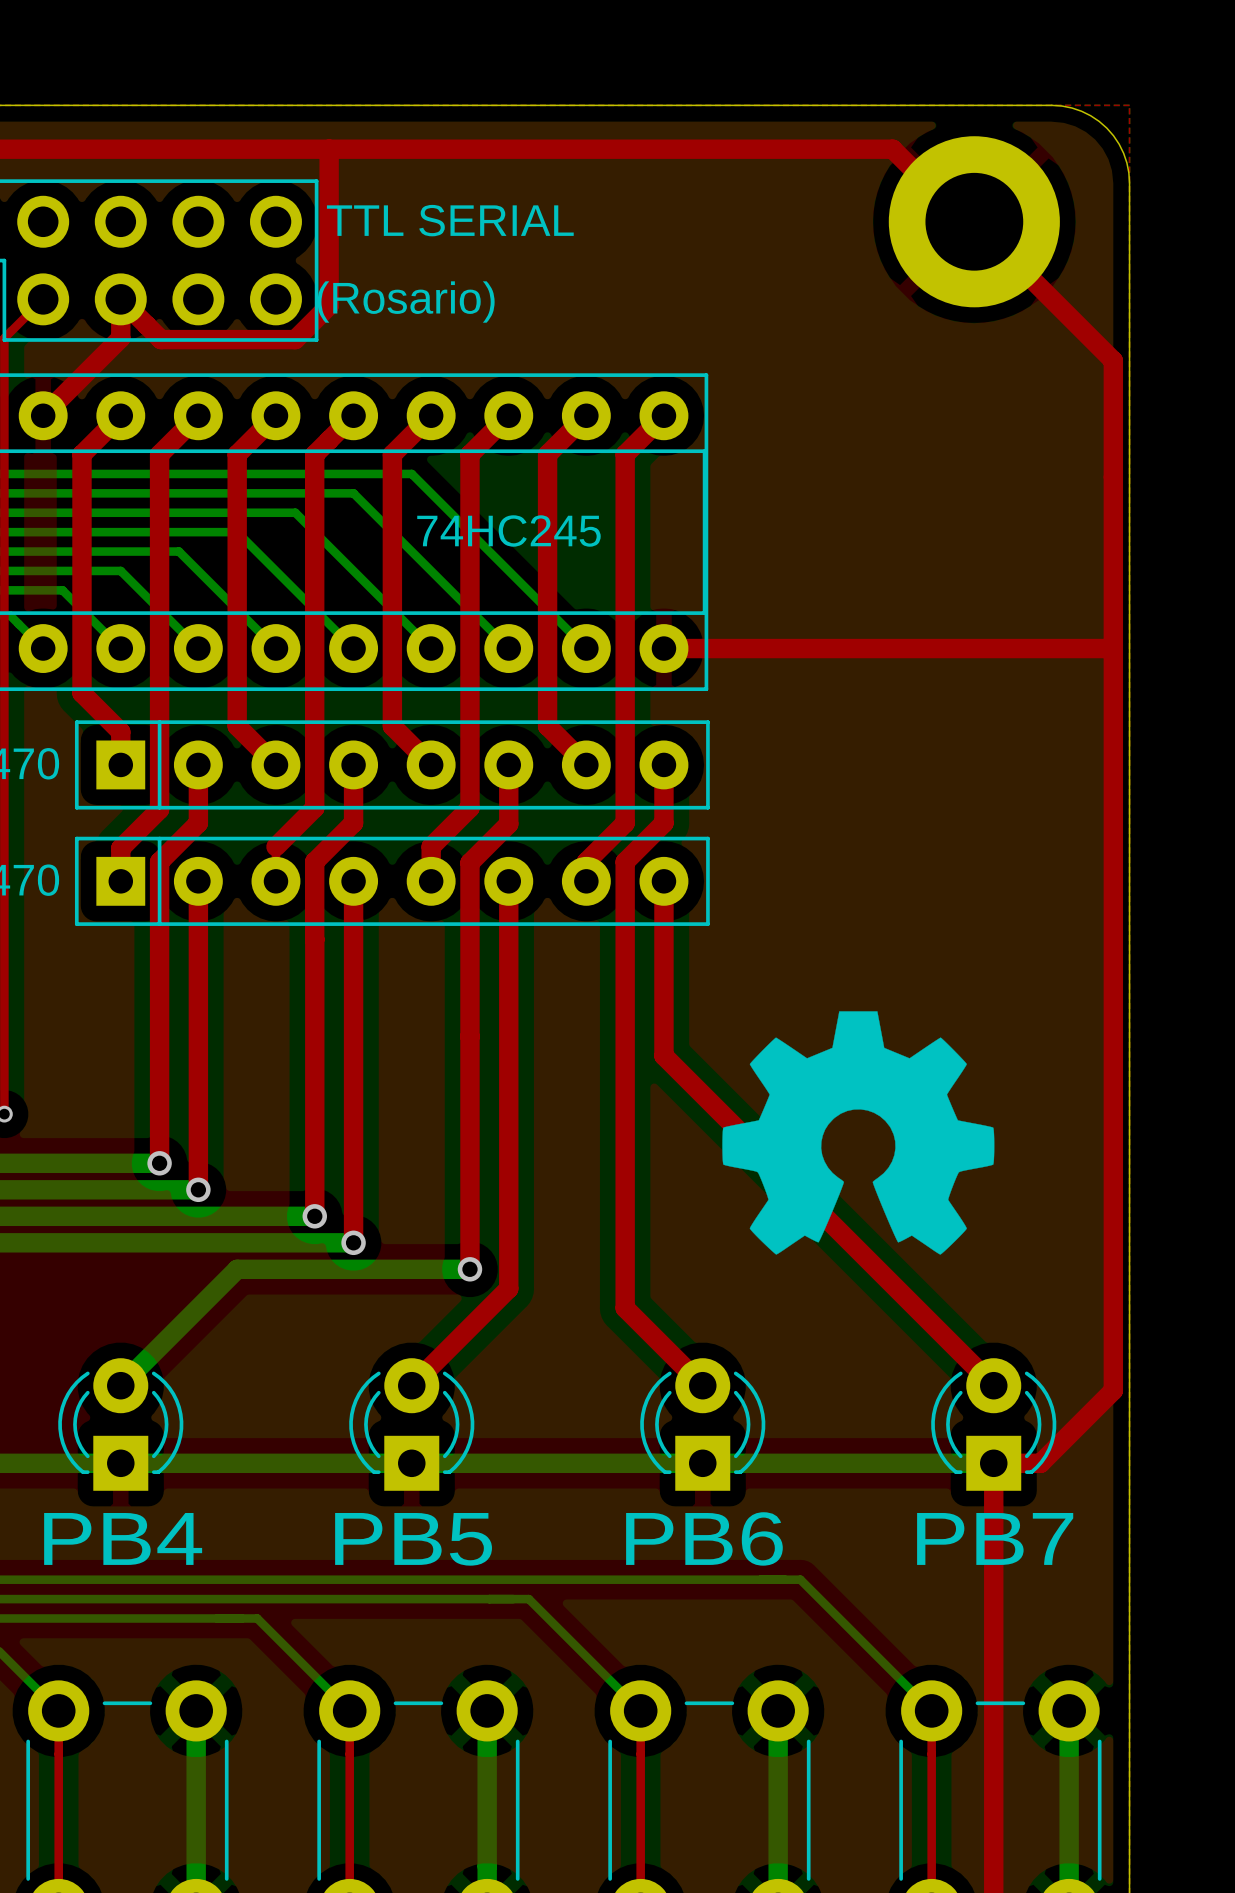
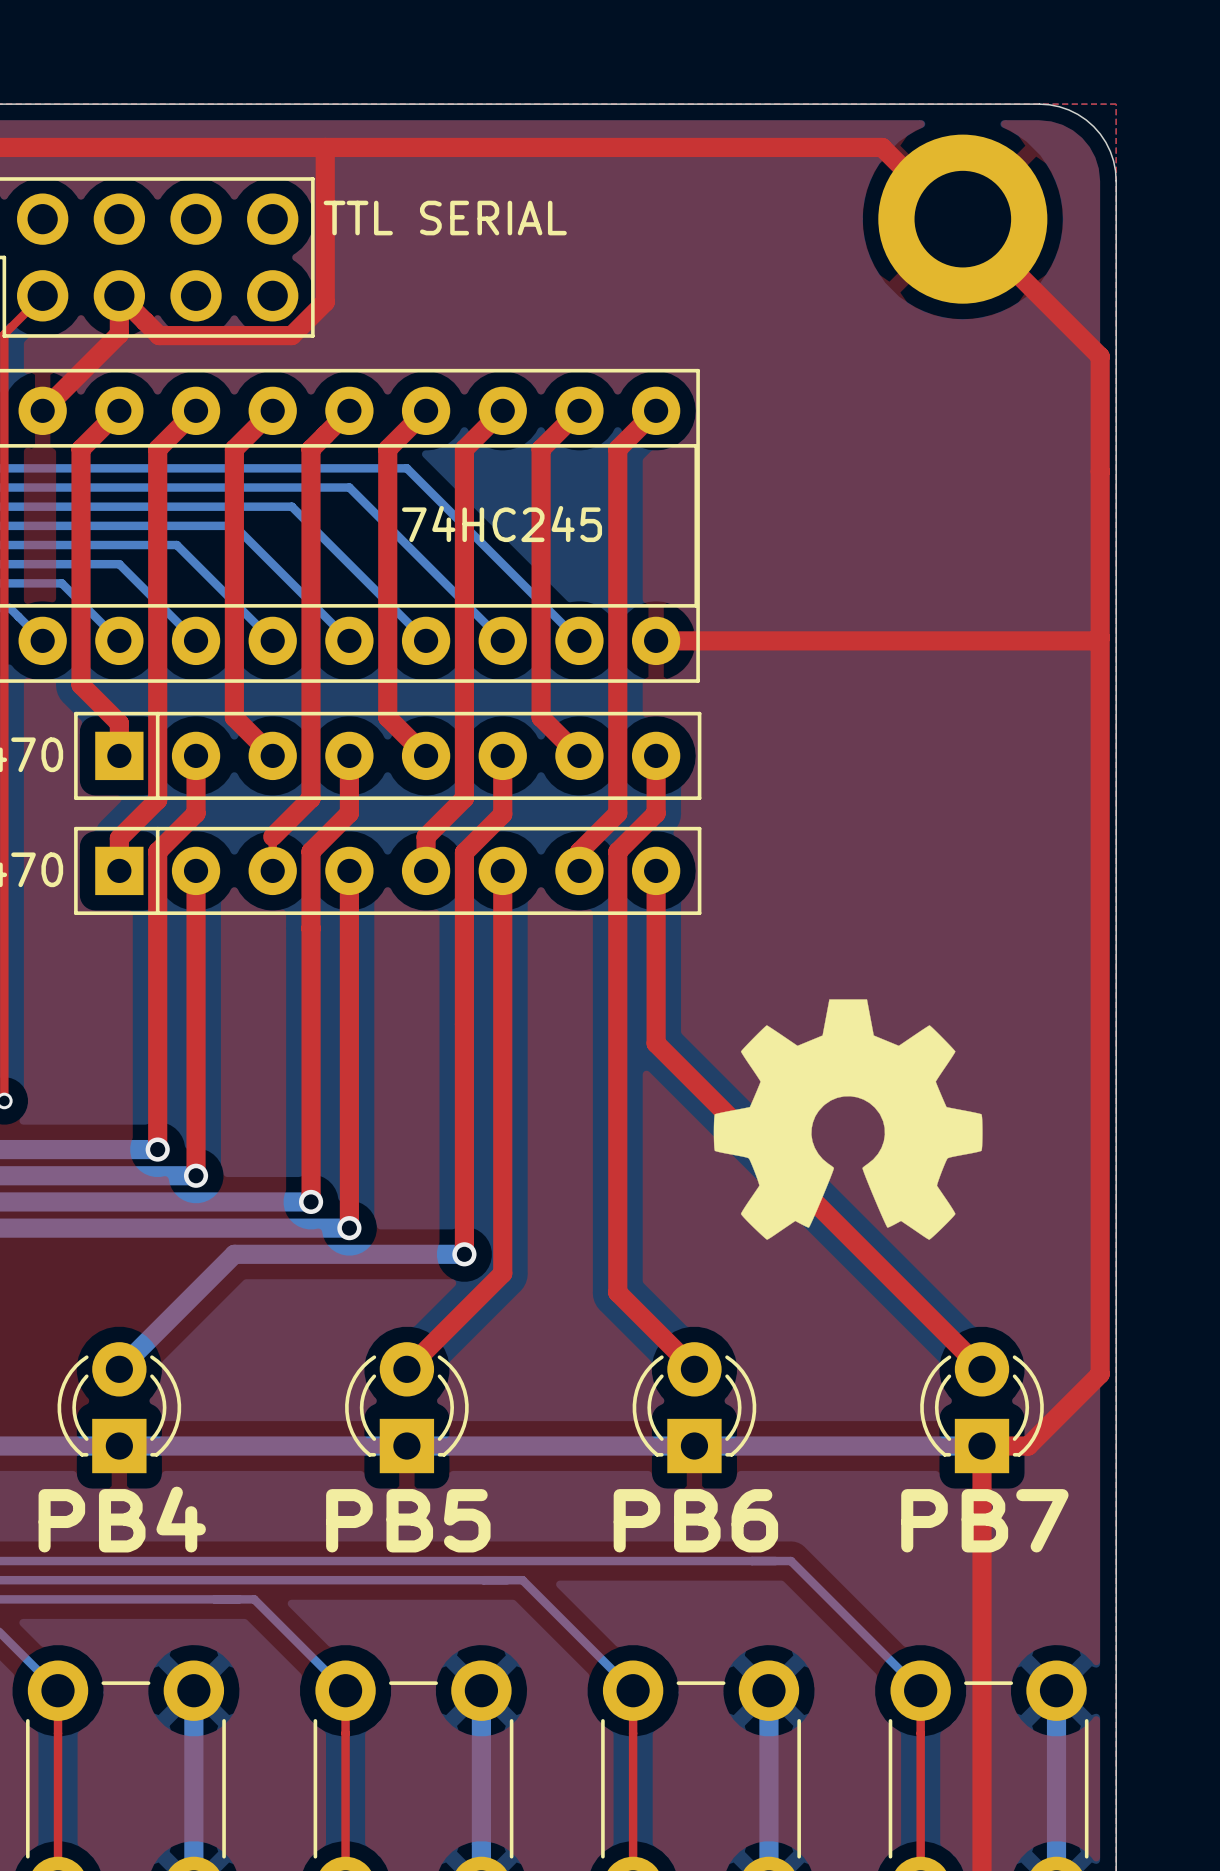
text: (Rosario) (406, 302) -> none

